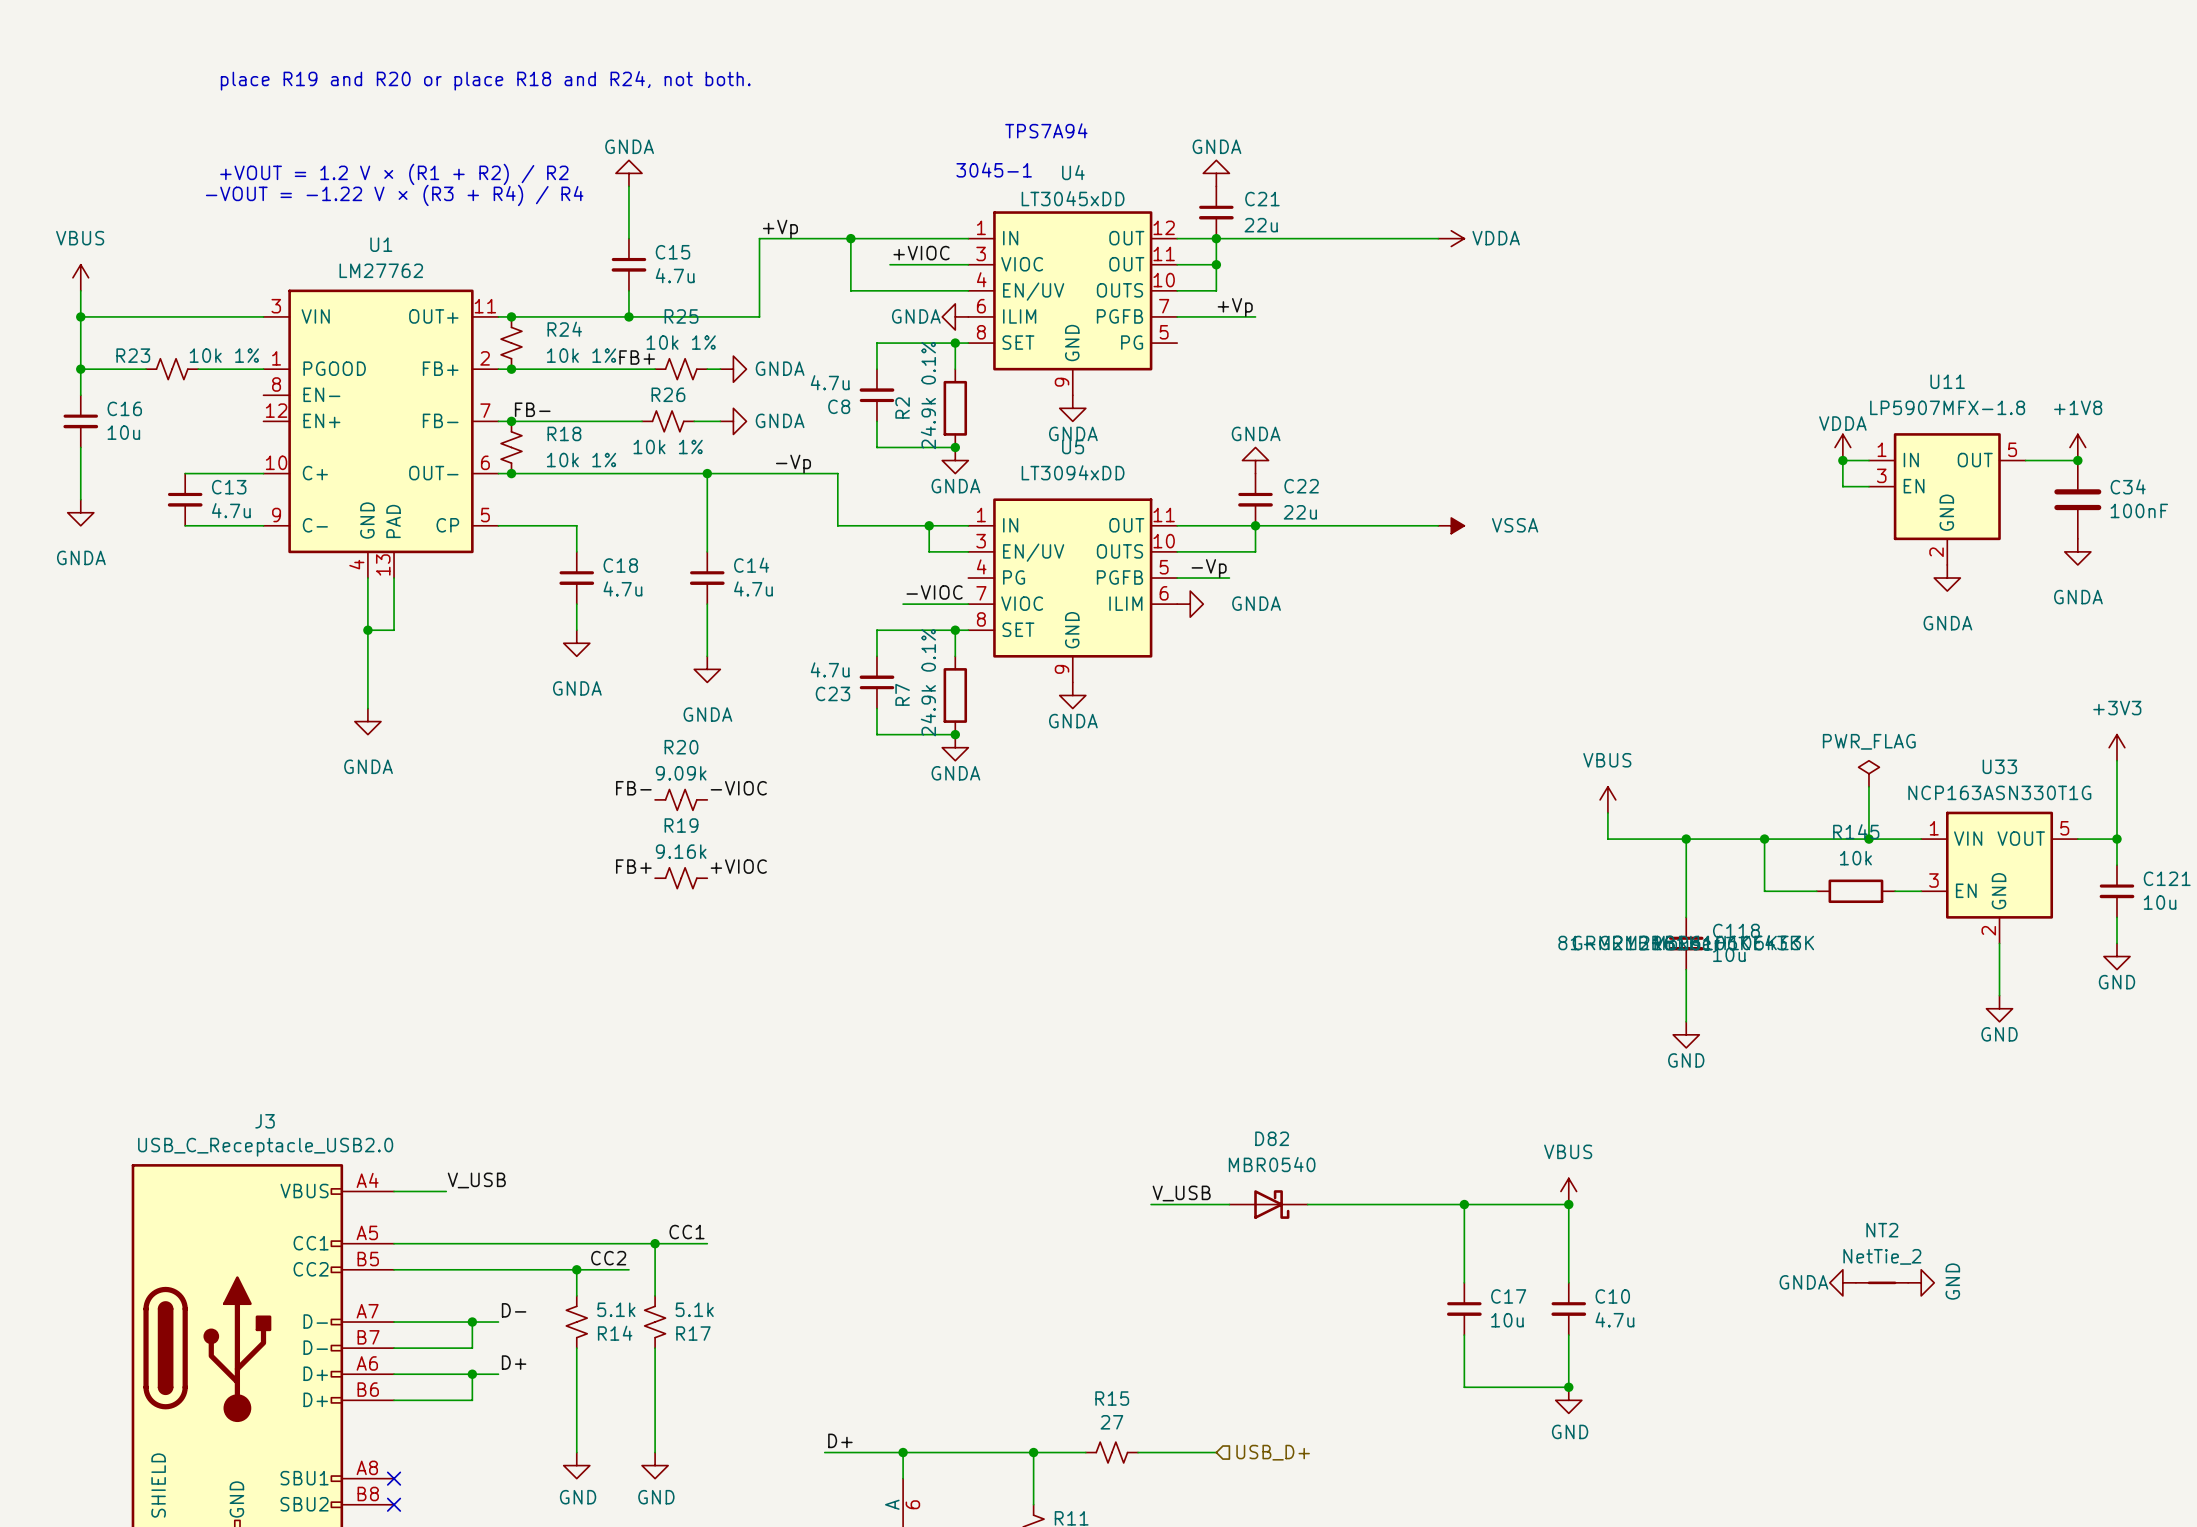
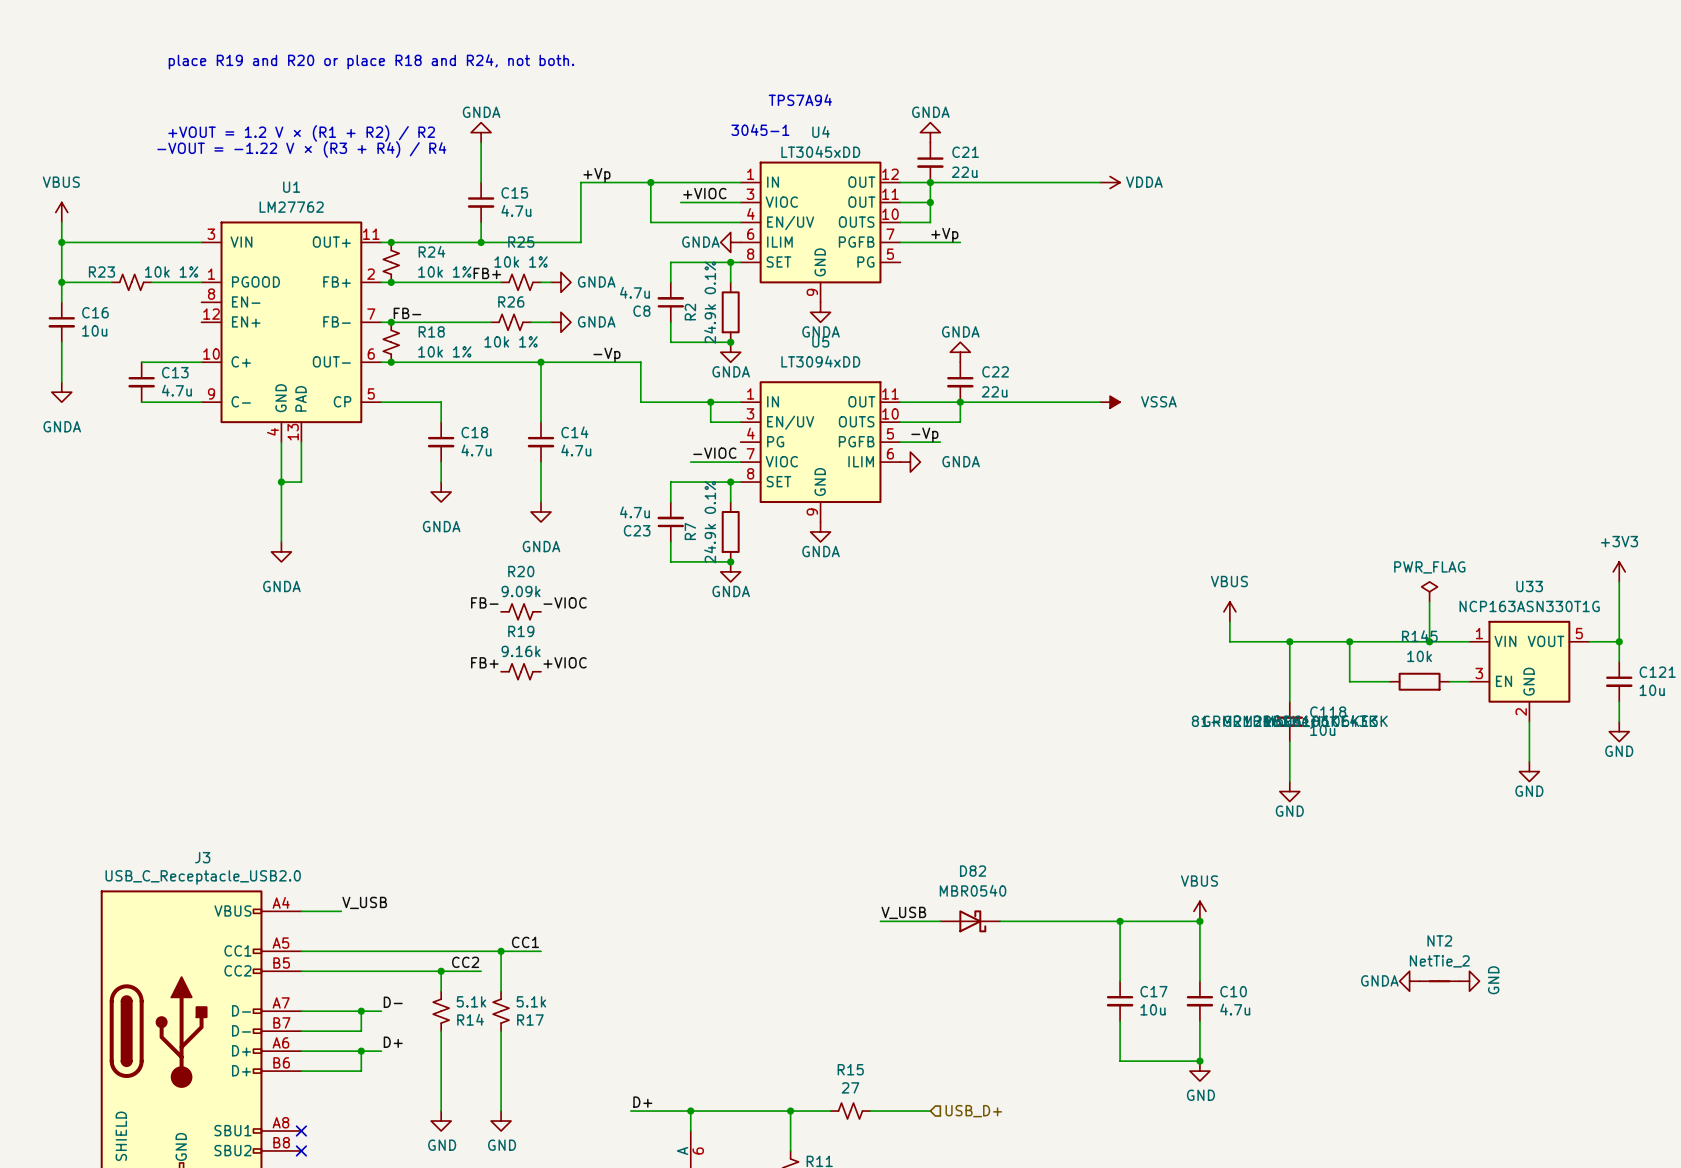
power symbol: VDDA (1842, 447) -> none
power symbol: +1V8 (2077, 447) -> none
junction: (1842, 460) -> none
wire: (1868, 460) (1842, 460) (1842, 486) (1868, 486) -> none
wire: (2025, 460) (2077, 460) -> none
junction: (2077, 460) -> none
U11: LP5907MFX-1.8 (1947, 499) -> none
C34: 100nF (2077, 499) -> none
power symbol: GNDA (2077, 551) -> none
power symbol: GNDA (1947, 578) -> none

